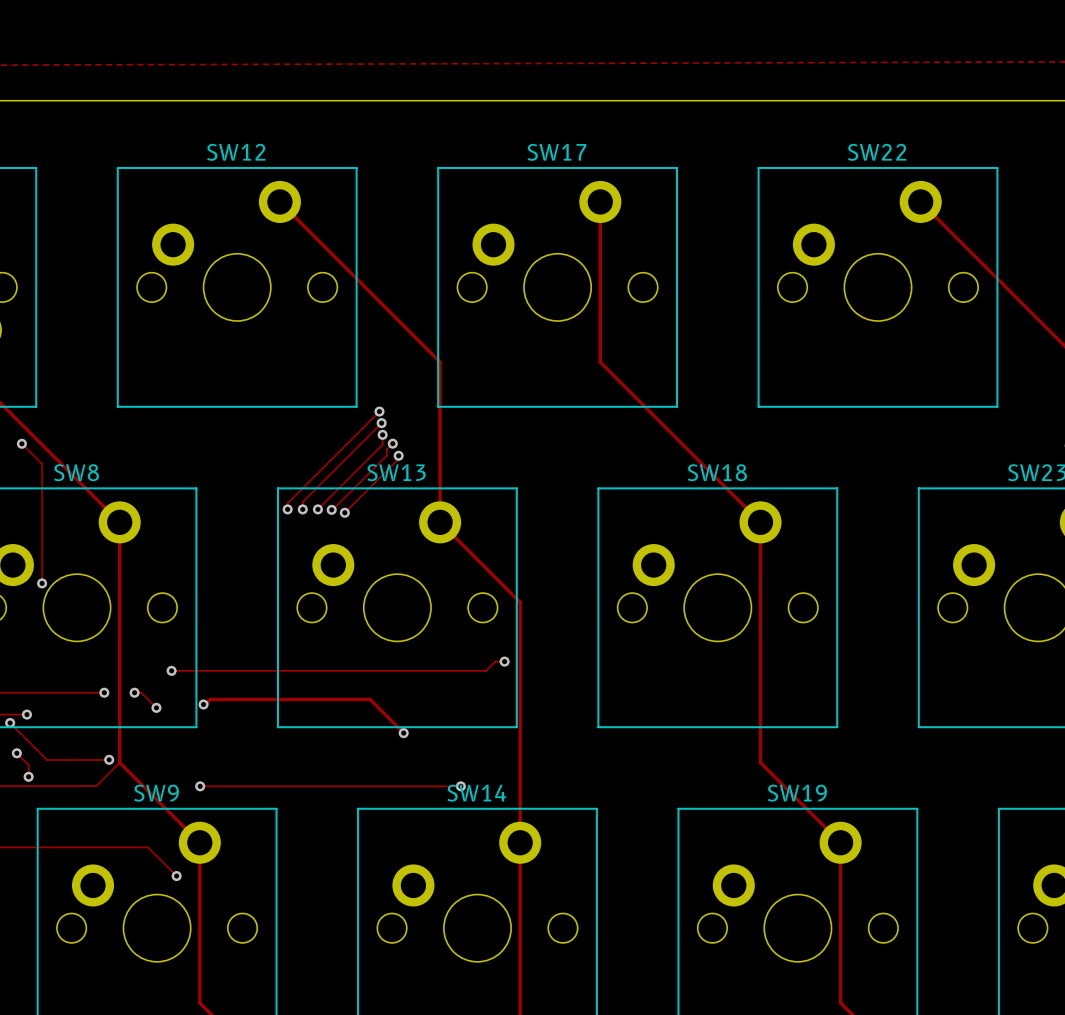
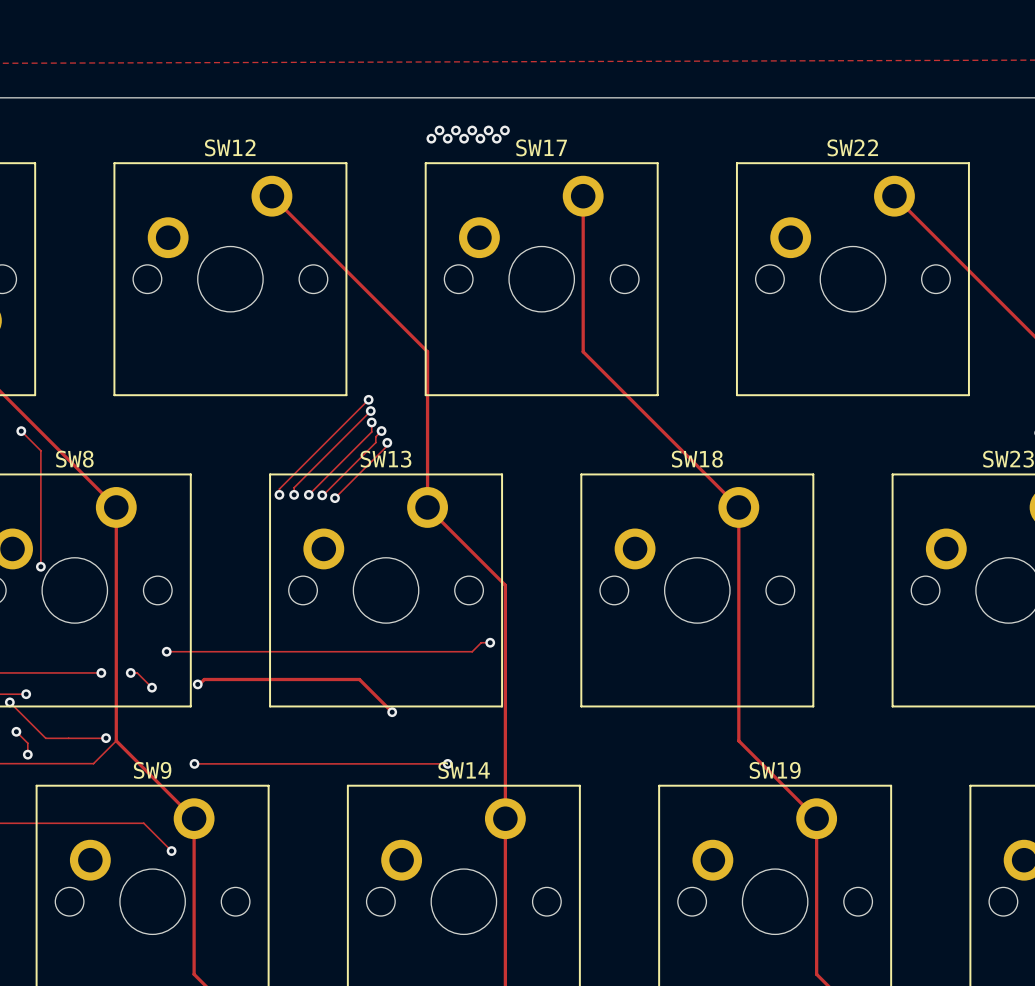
via: none -> (439, 130)
via: none -> (455, 130)
via: none -> (472, 130)
via: none -> (488, 130)
via: none -> (504, 130)
via: none -> (431, 138)
via: none -> (447, 138)
via: none -> (464, 138)
via: none -> (480, 138)
via: none -> (496, 138)

